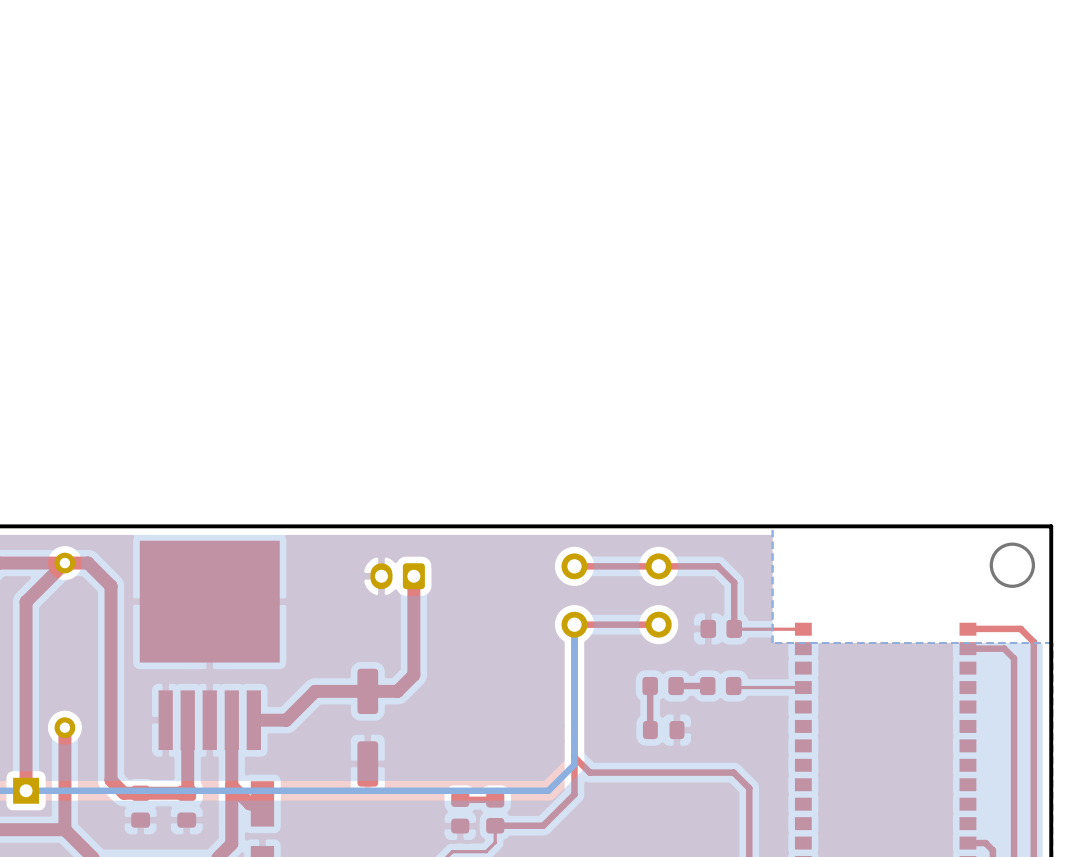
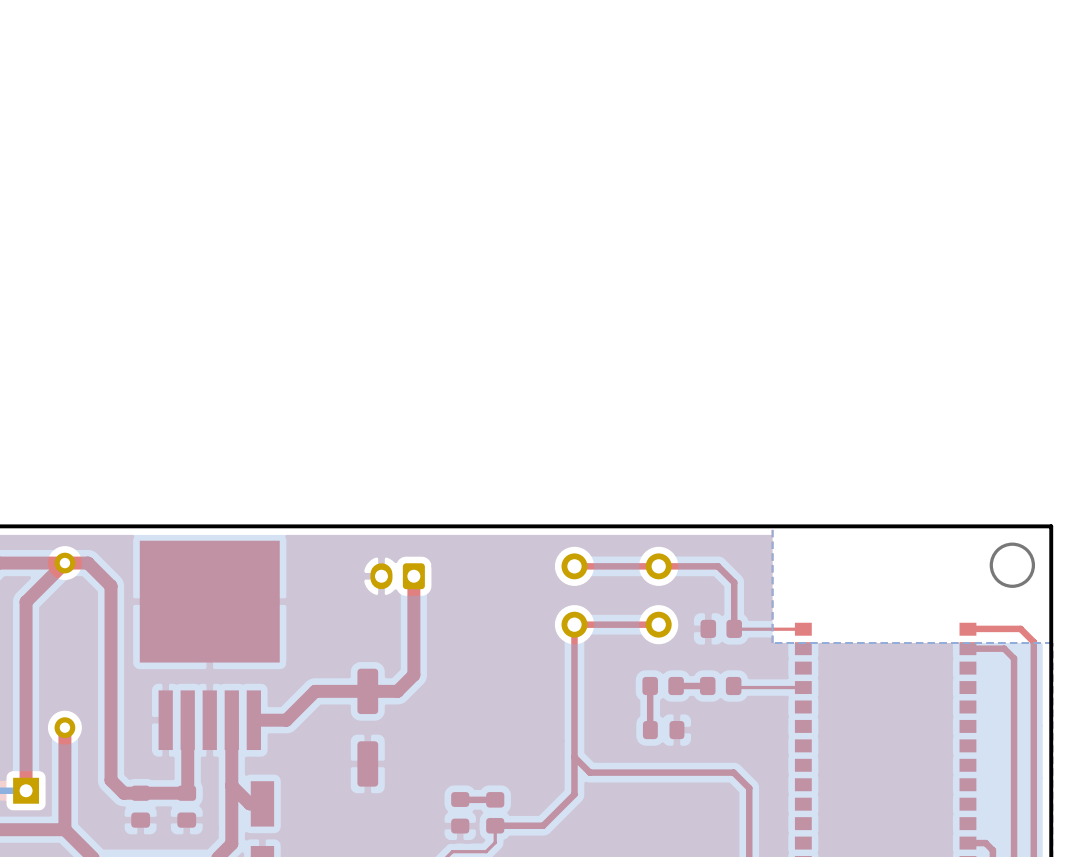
bottom track: (574, 624) (574, 764) (548, 790) (26, 790) -> none

